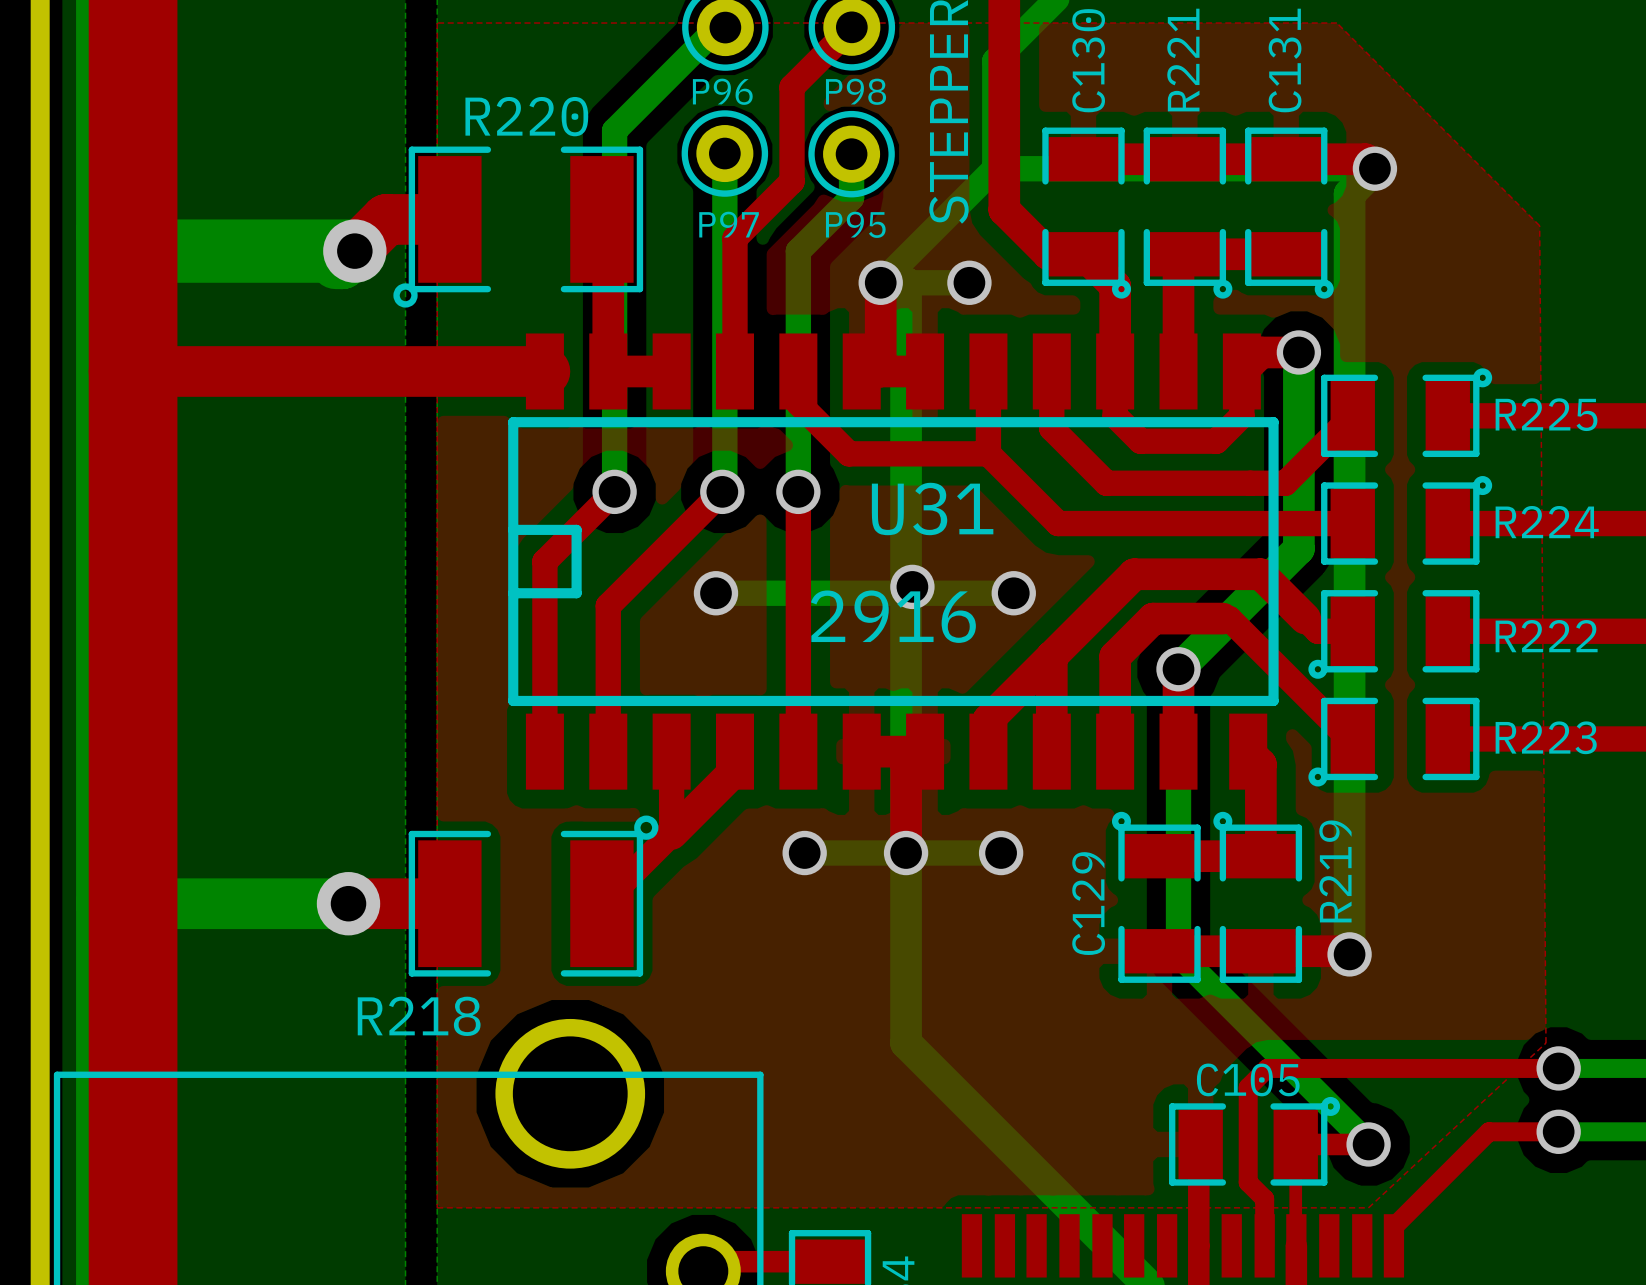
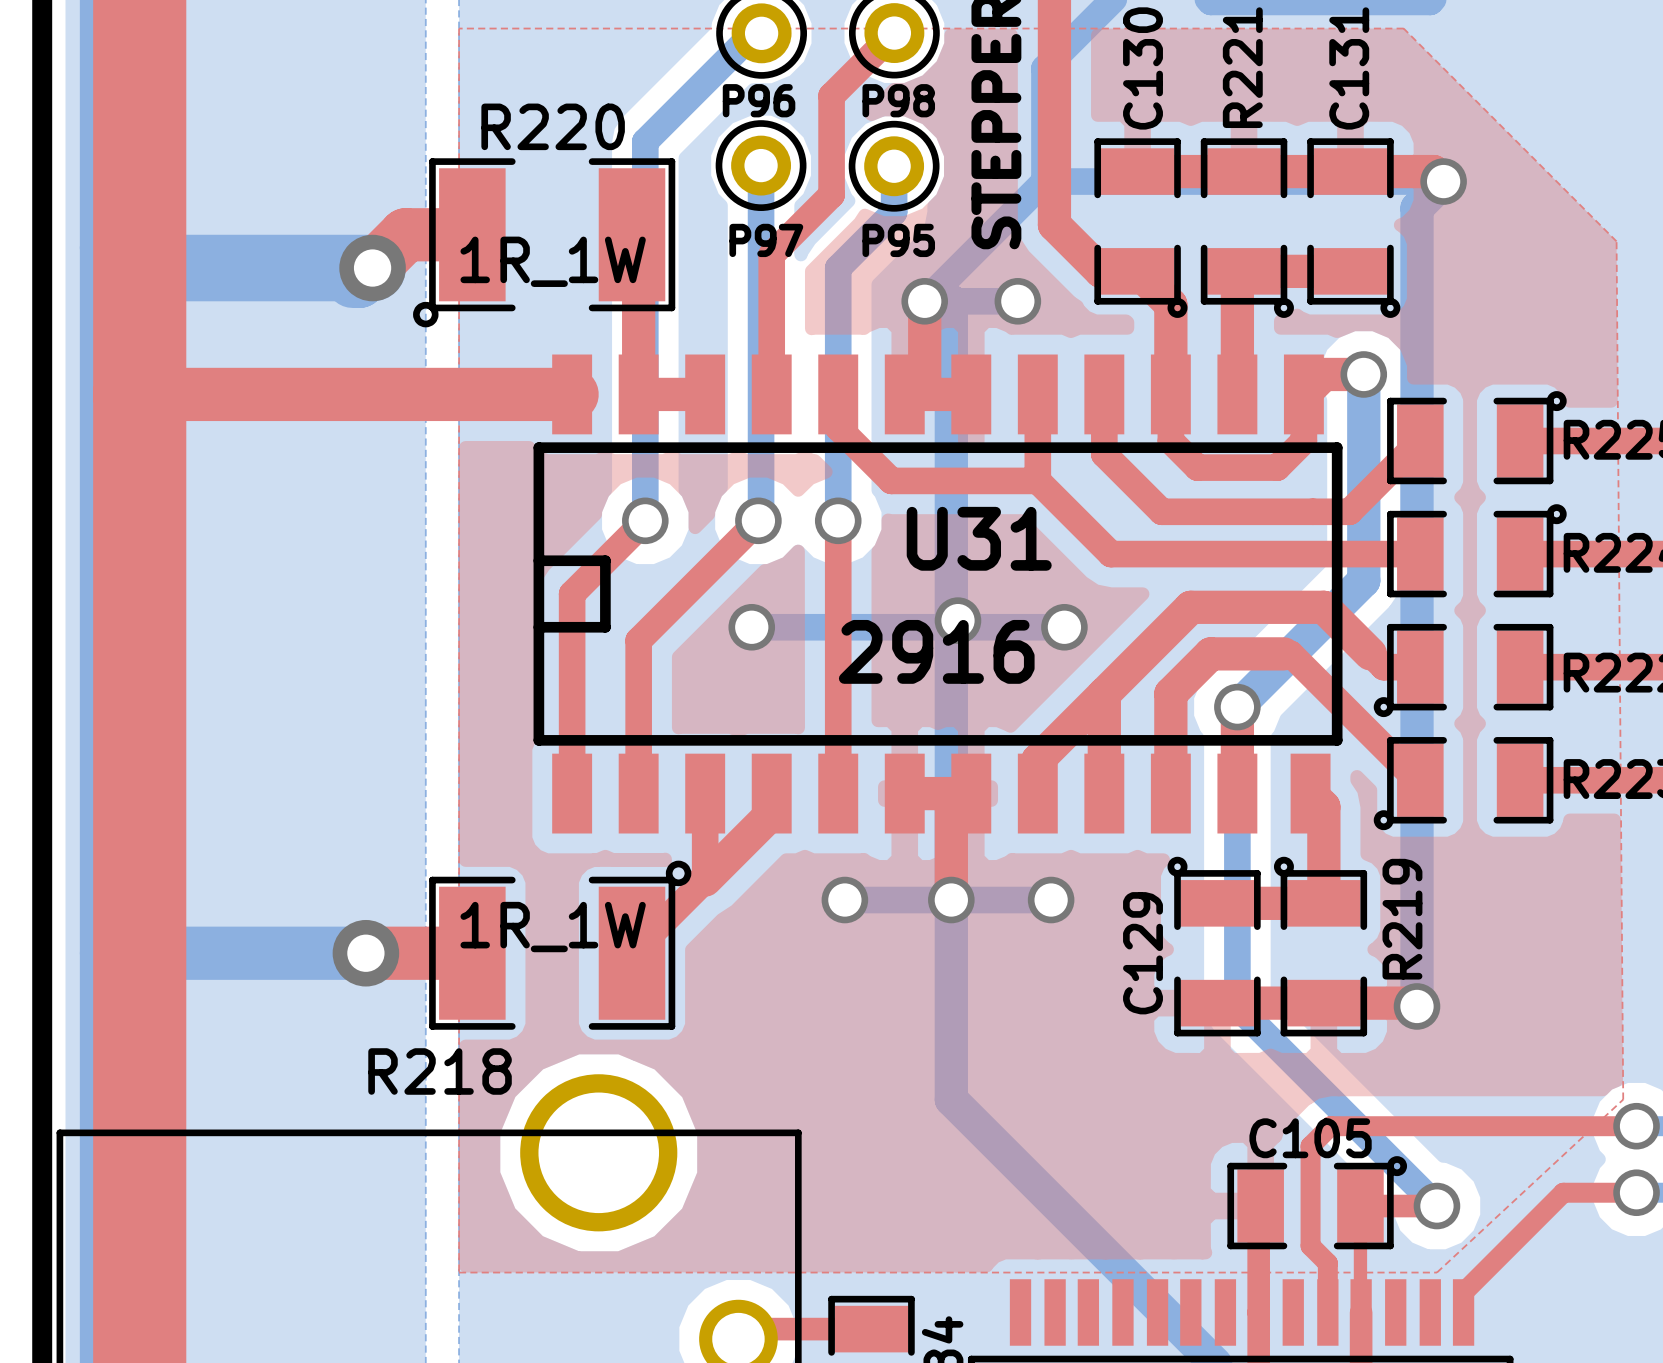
R220 value: none -> 1R_1W (553, 261)
R218 value: none -> 1R_1W (553, 927)

